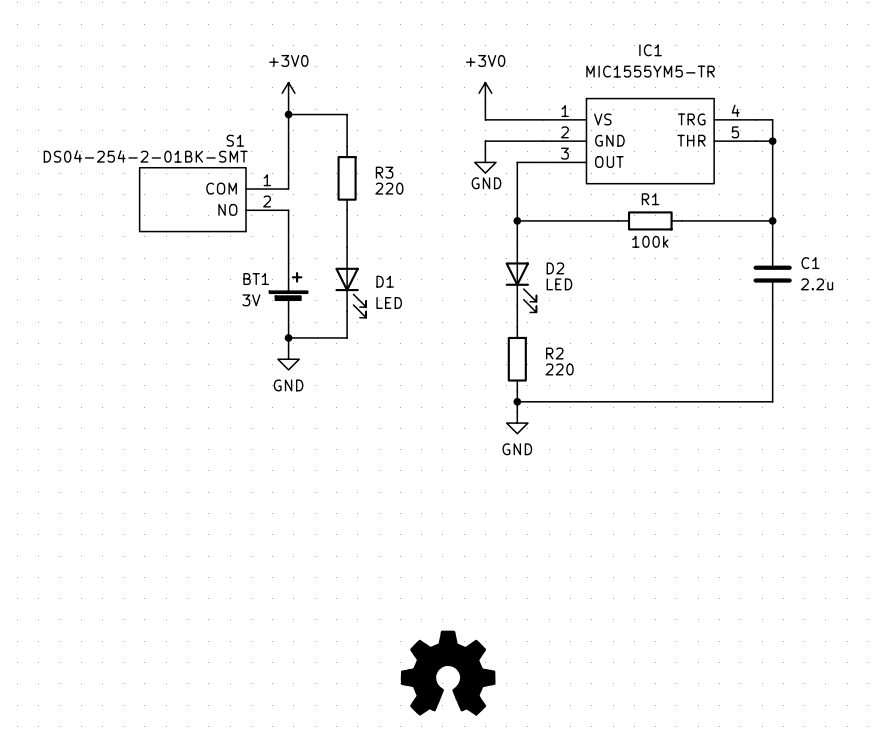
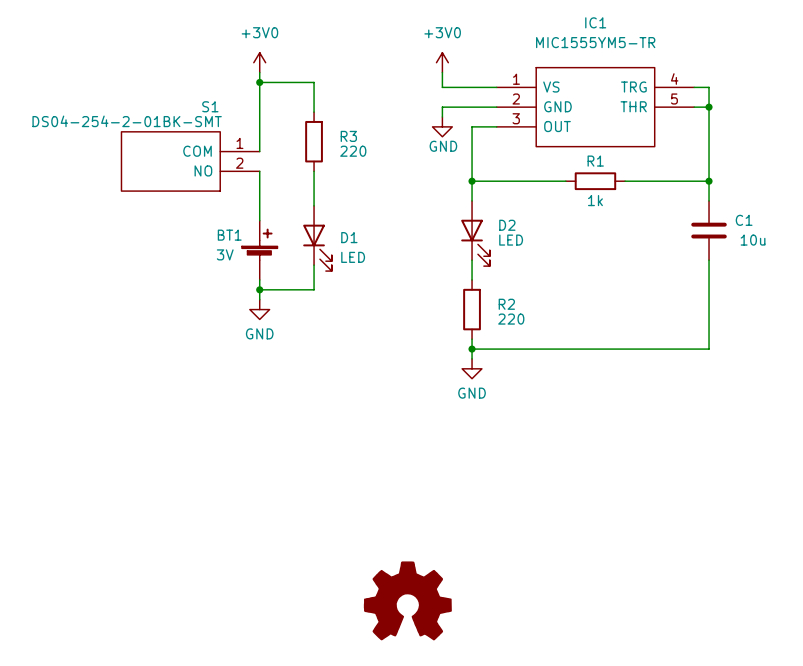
R1 value: 100k (650, 241) -> 1k (595, 200)
C1 value: 2.2u (817, 284) -> 10u (753, 240)

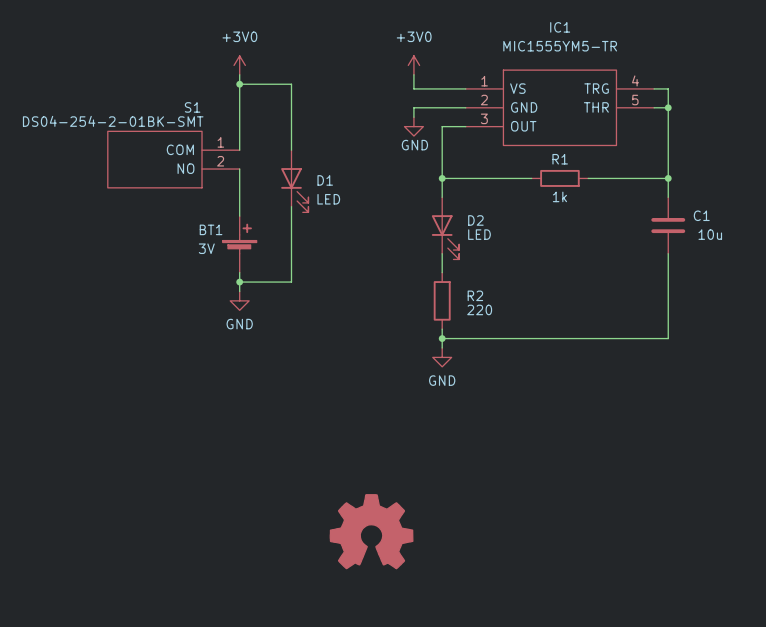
wire: none -> (291, 112) (291, 150)
R3: 220 (314, 141) -> none
D1 position: (317, 238) -> (294, 181)
power symbol position: (407, 600) -> (371, 531)

